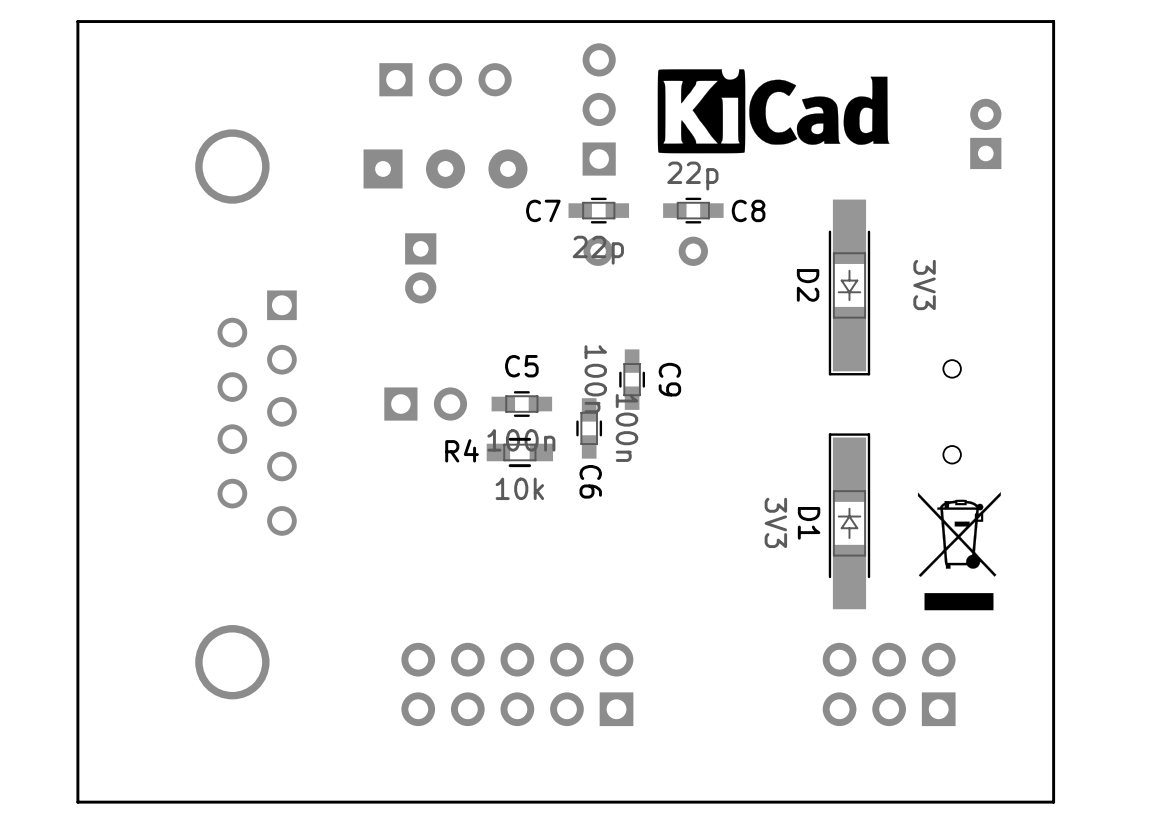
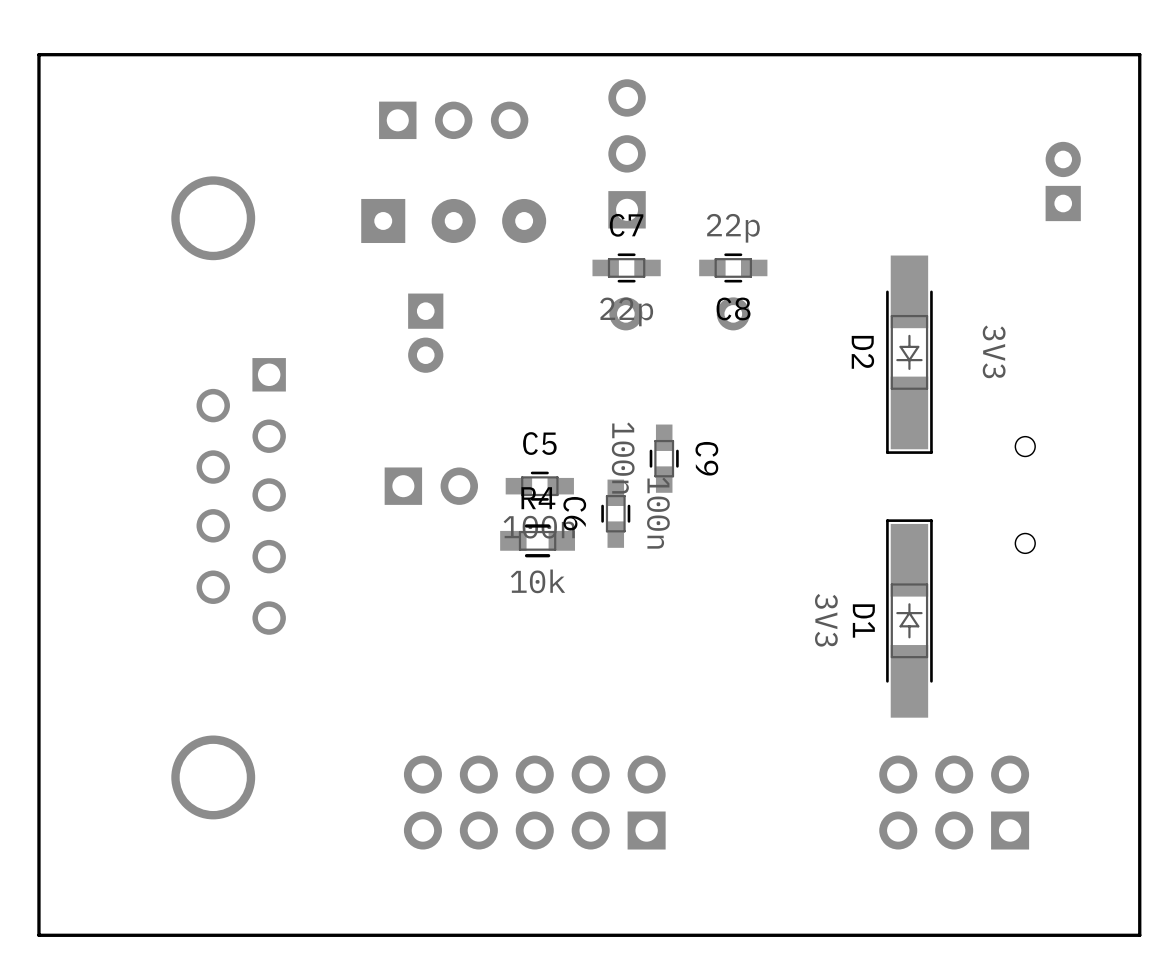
drawing: [657, 69, 890, 154] -> none
C7 name position: C7 (543, 210) -> C7 (626, 225)
C8 name position: C8 (748, 210) -> C8 (733, 308)
R4 name position: R4 (462, 450) -> R4 (538, 498)
C6 name position: C6 (590, 481) -> C6 (574, 513)
drawing: [917, 492, 1001, 611] -> none

